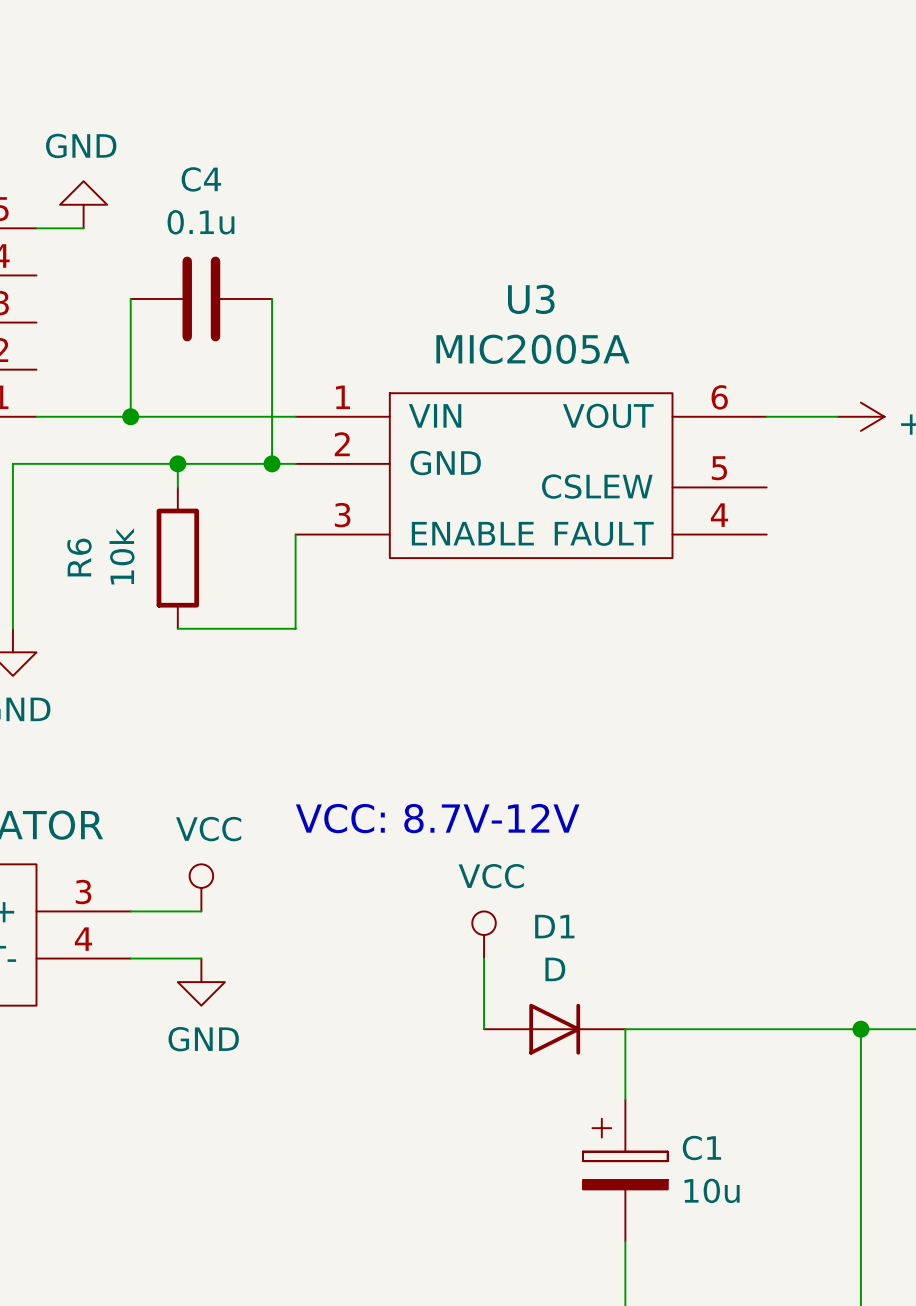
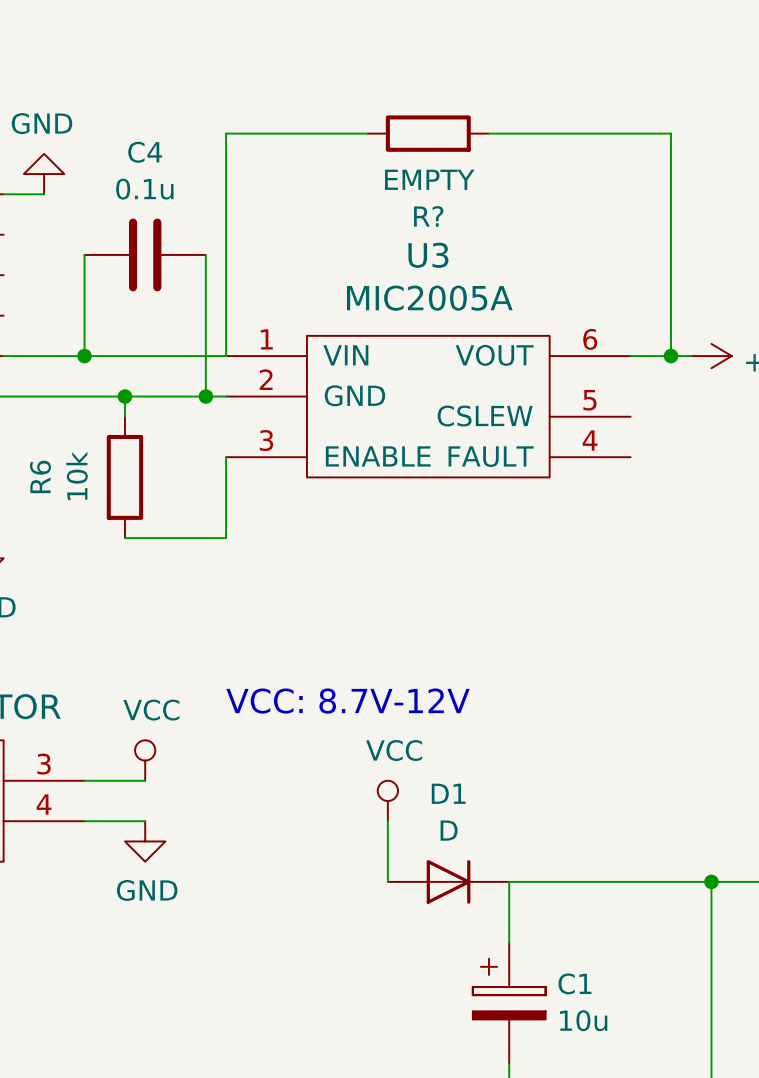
wire: none -> (367, 133) (226, 133) (226, 356)
R?: none -> EMPTY (428, 133)
wire: none -> (489, 133) (671, 133) (671, 356)
junction: none -> (671, 356)

